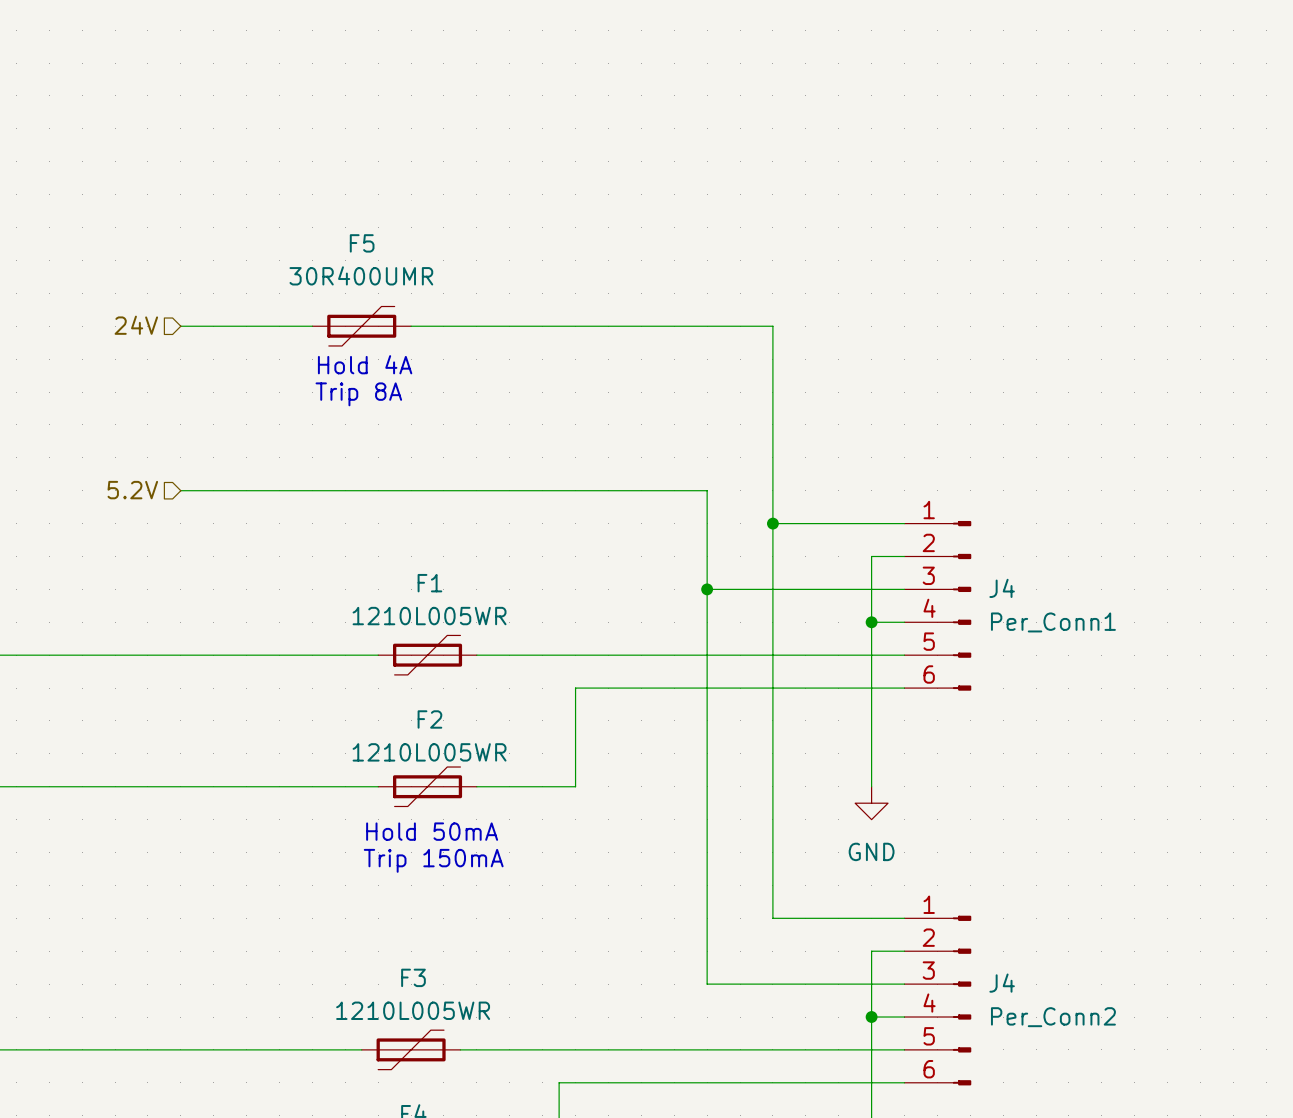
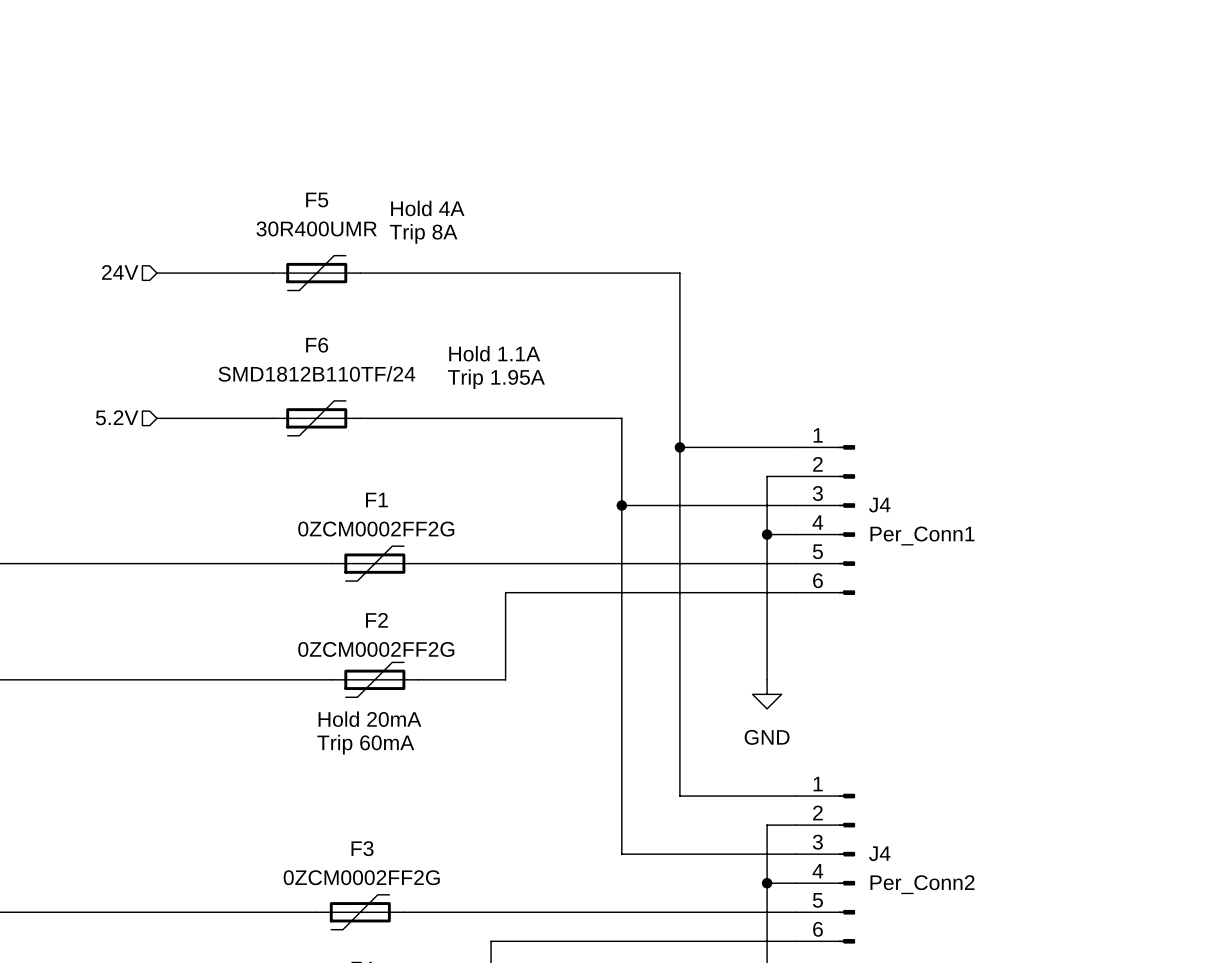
text position: Hold 4A (365, 364) -> Hold 4A (427, 208)
text position: Trip 8A (358, 394) -> Trip 8A (423, 233)
text: none -> Hold 1.1A (494, 353)
text: none -> Trip 1.95A (496, 379)
F6: none -> SMD1812B110TF/24 (316, 418)
F1 value: 1210L005WR (429, 616) -> 0ZCM0002FF2G (376, 529)
F2 value: 1210L005WR (429, 752) -> 0ZCM0002FF2G (376, 649)
text: Hold 50mA (432, 831) -> Hold 20mA (369, 719)
text: Trip 150mA (433, 860) -> Trip 60mA (365, 744)
F3 value: 1210L005WR (413, 1010) -> 0ZCM0002FF2G (361, 877)

